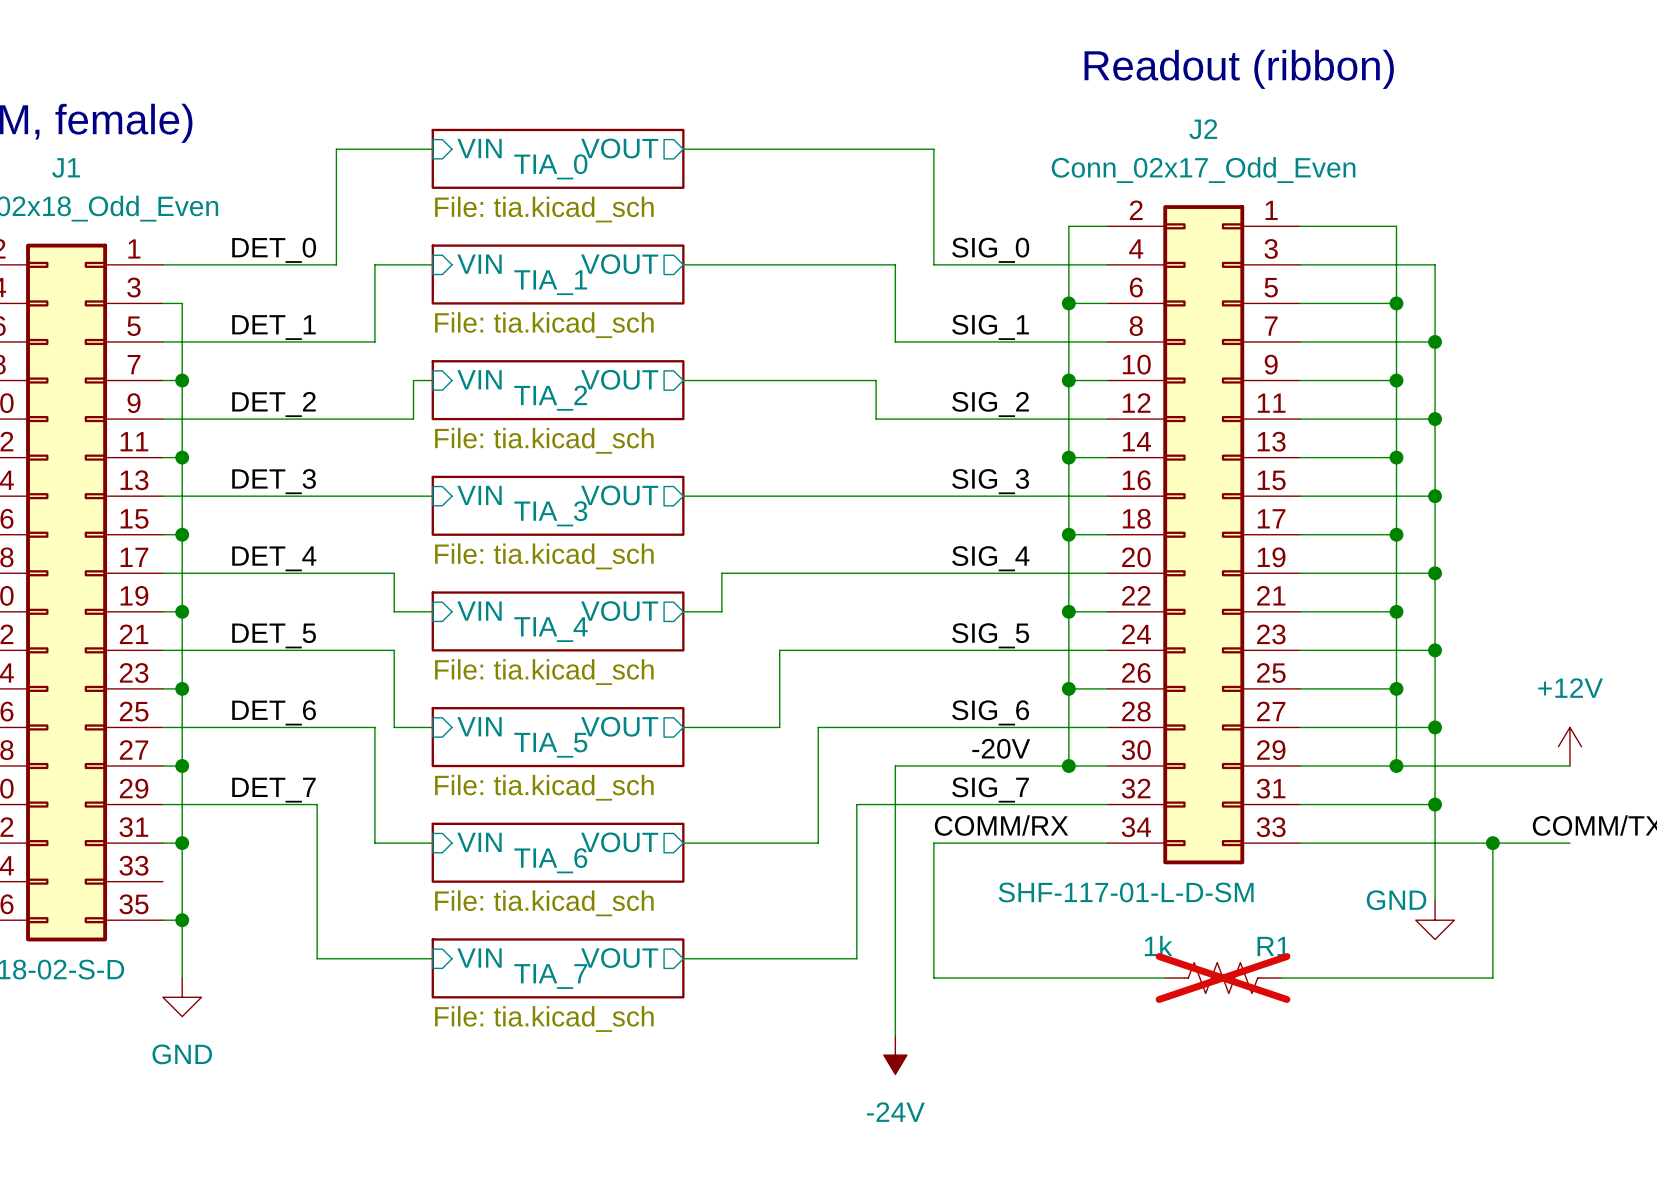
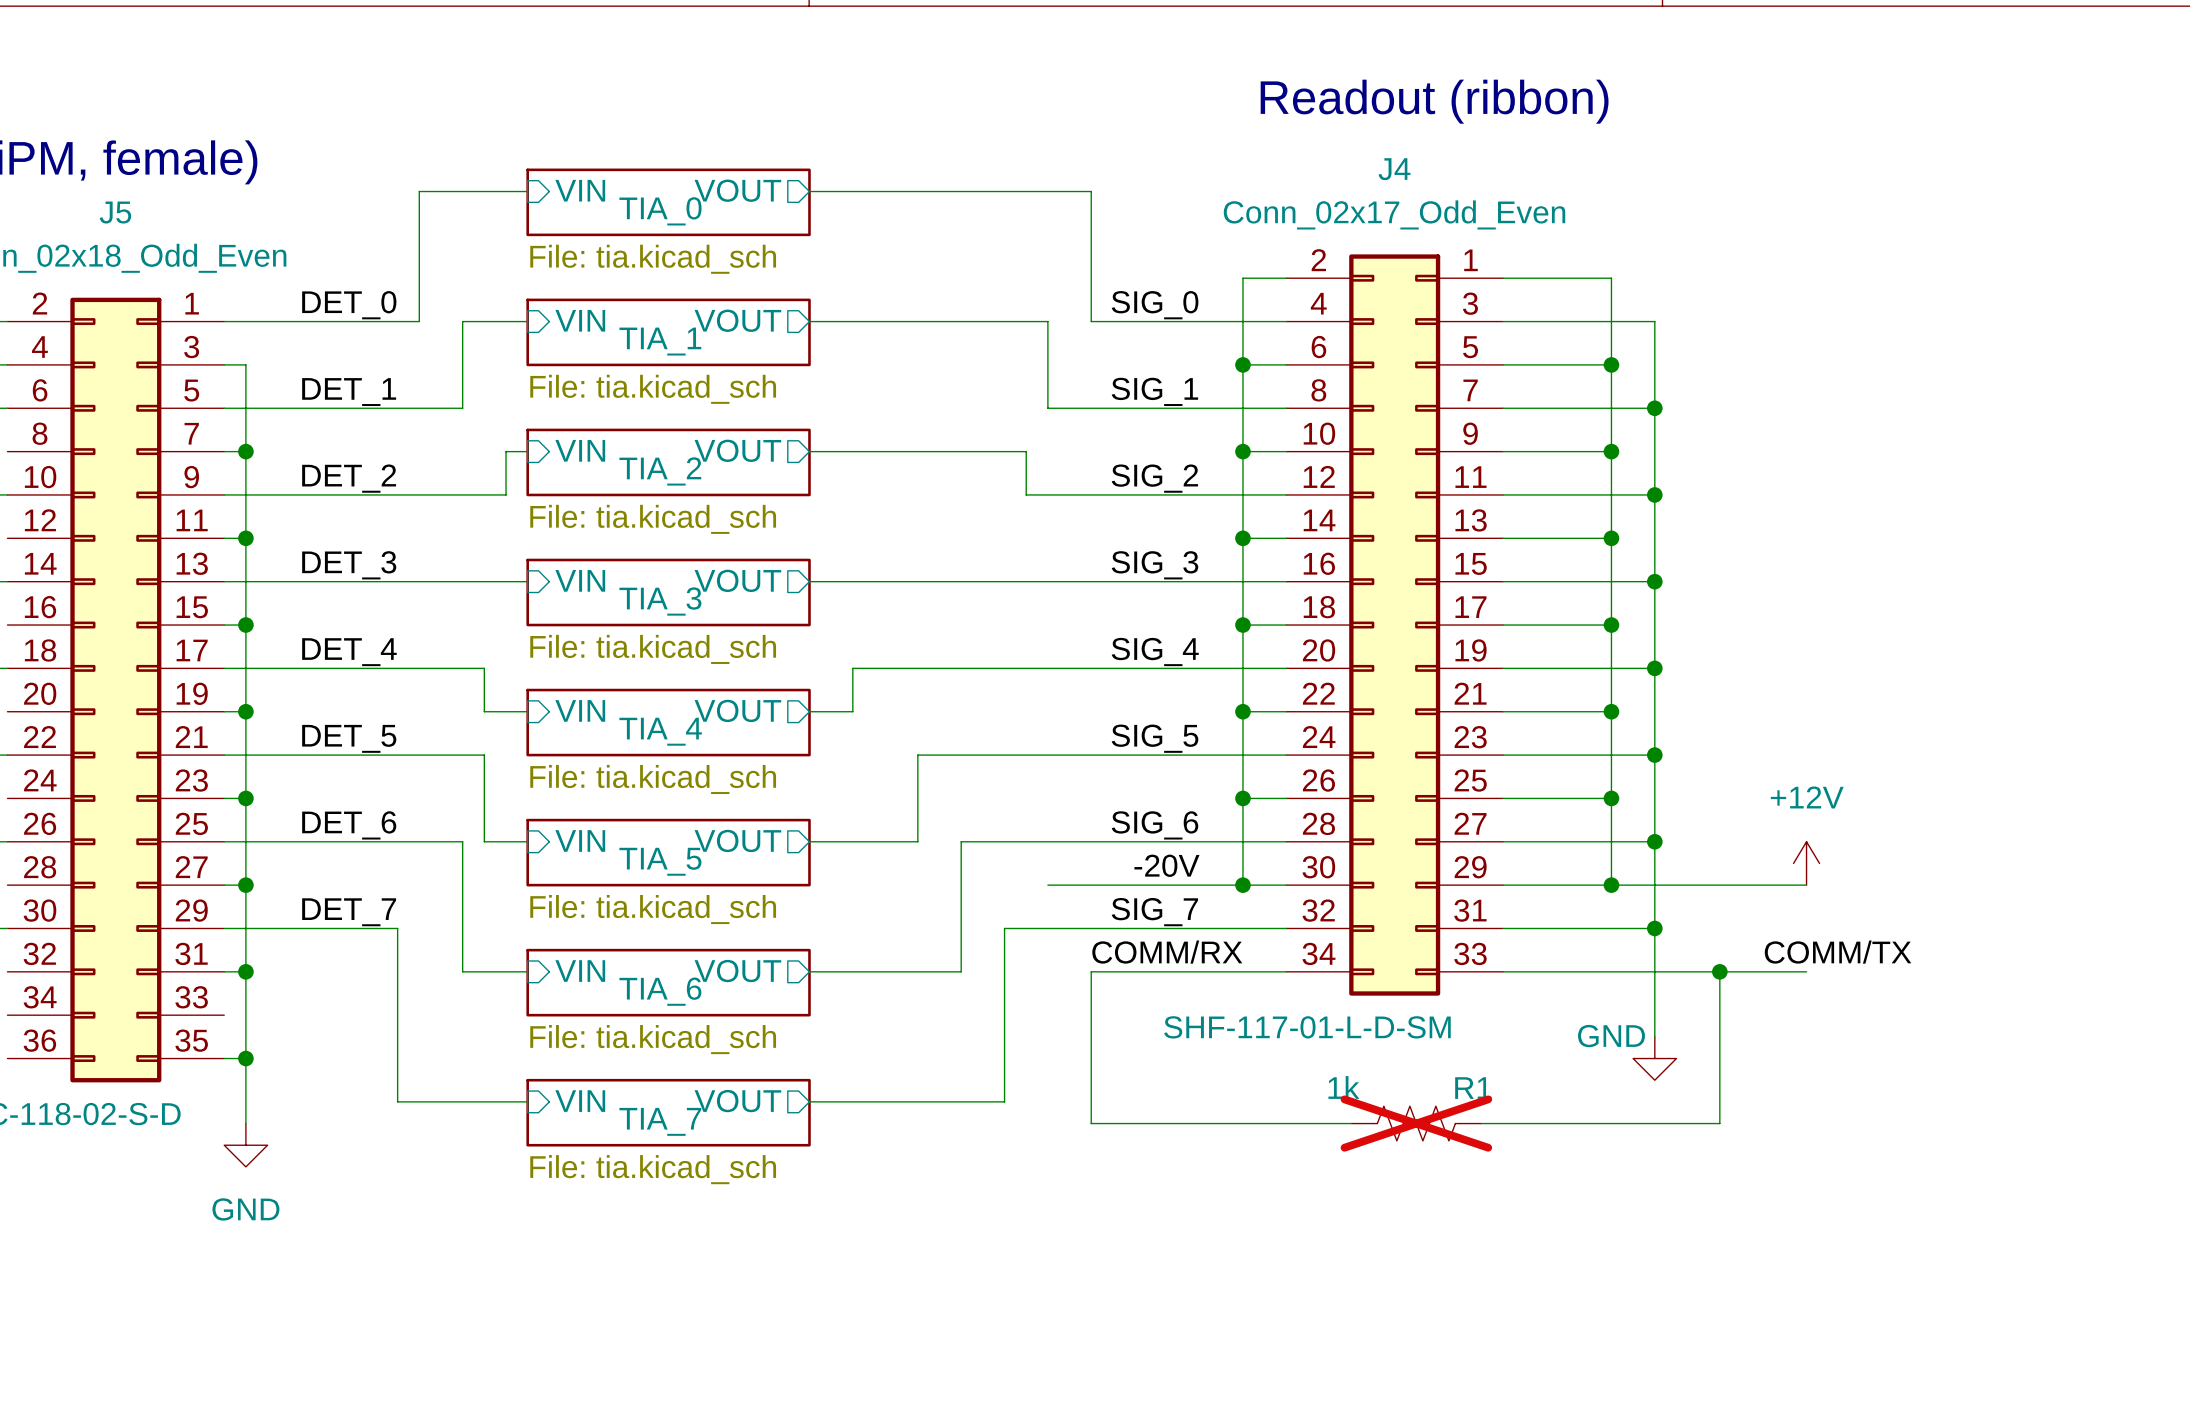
J2 name: J2 (1203, 129) -> J4 (1394, 169)
J1 name: J1 (66, 167) -> J5 (115, 212)
wire: (895, 766) (895, 1035) -> none
power symbol: -24V (895, 1055) -> none

